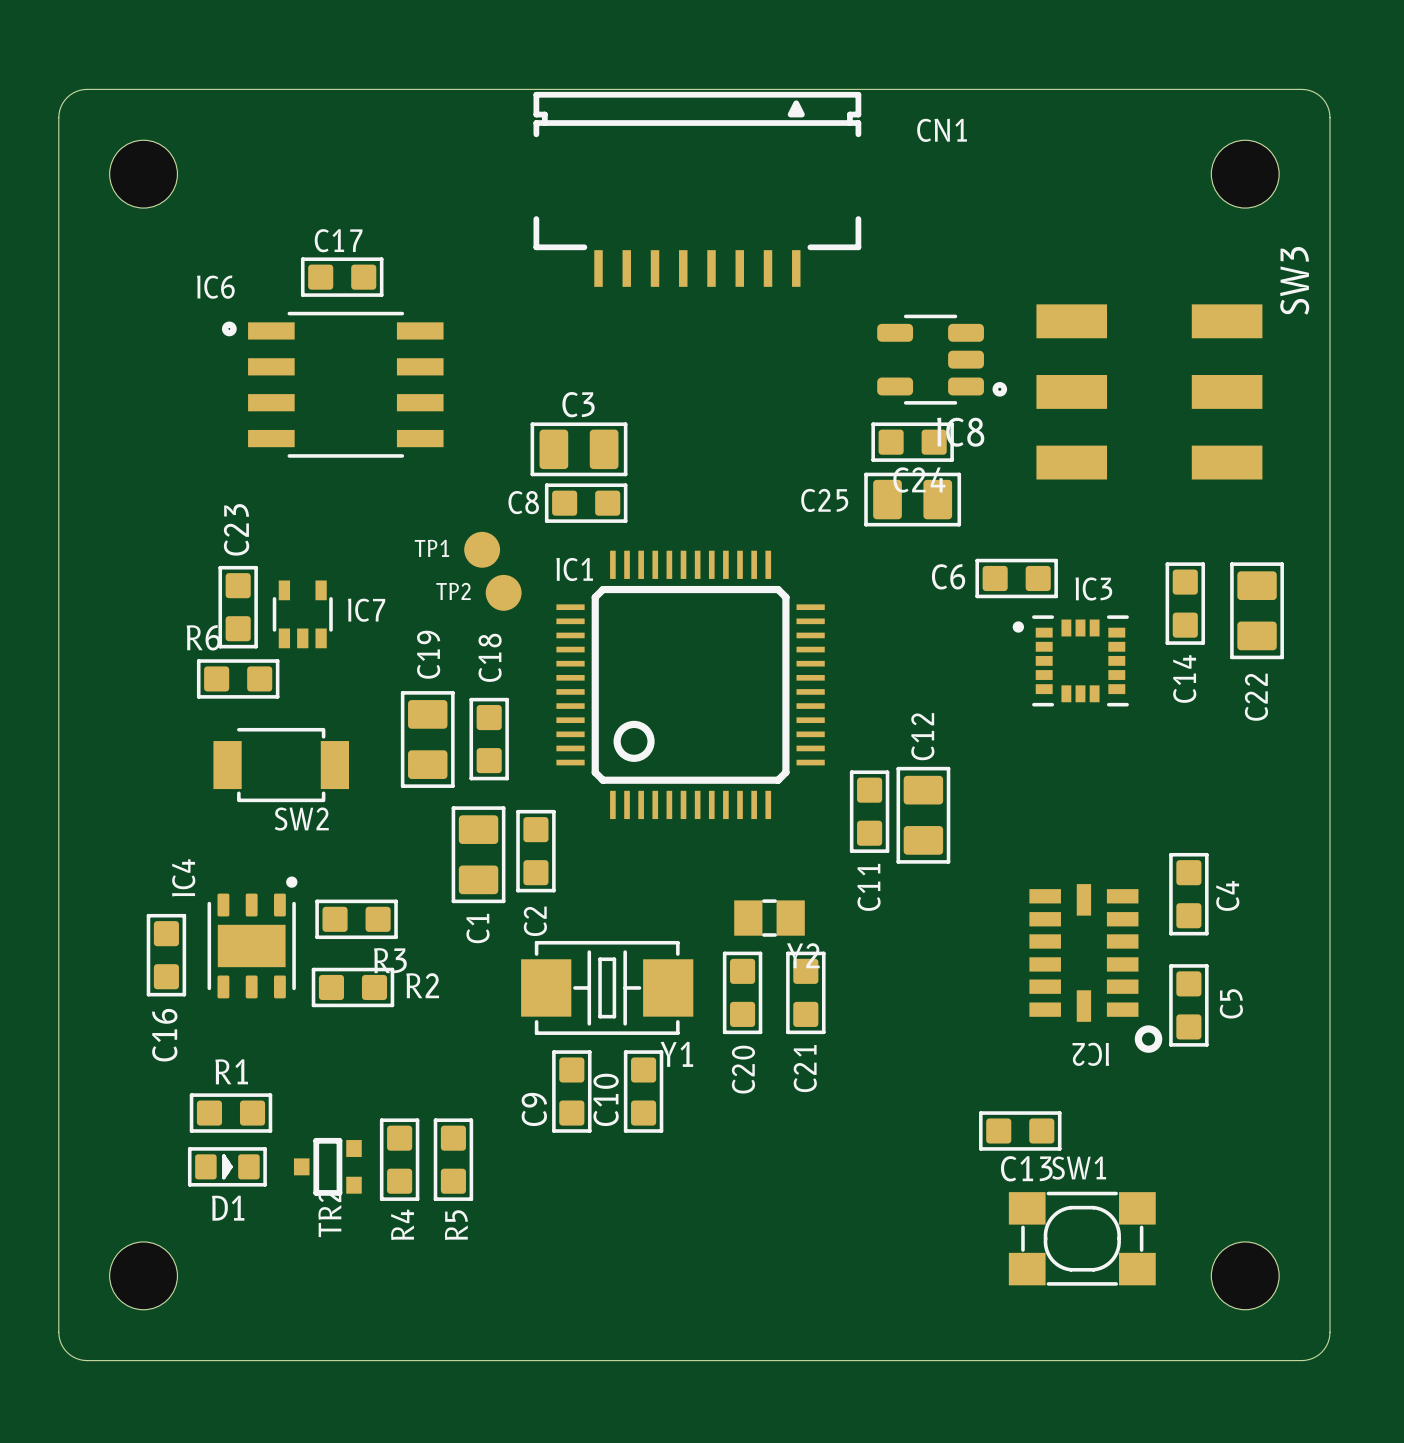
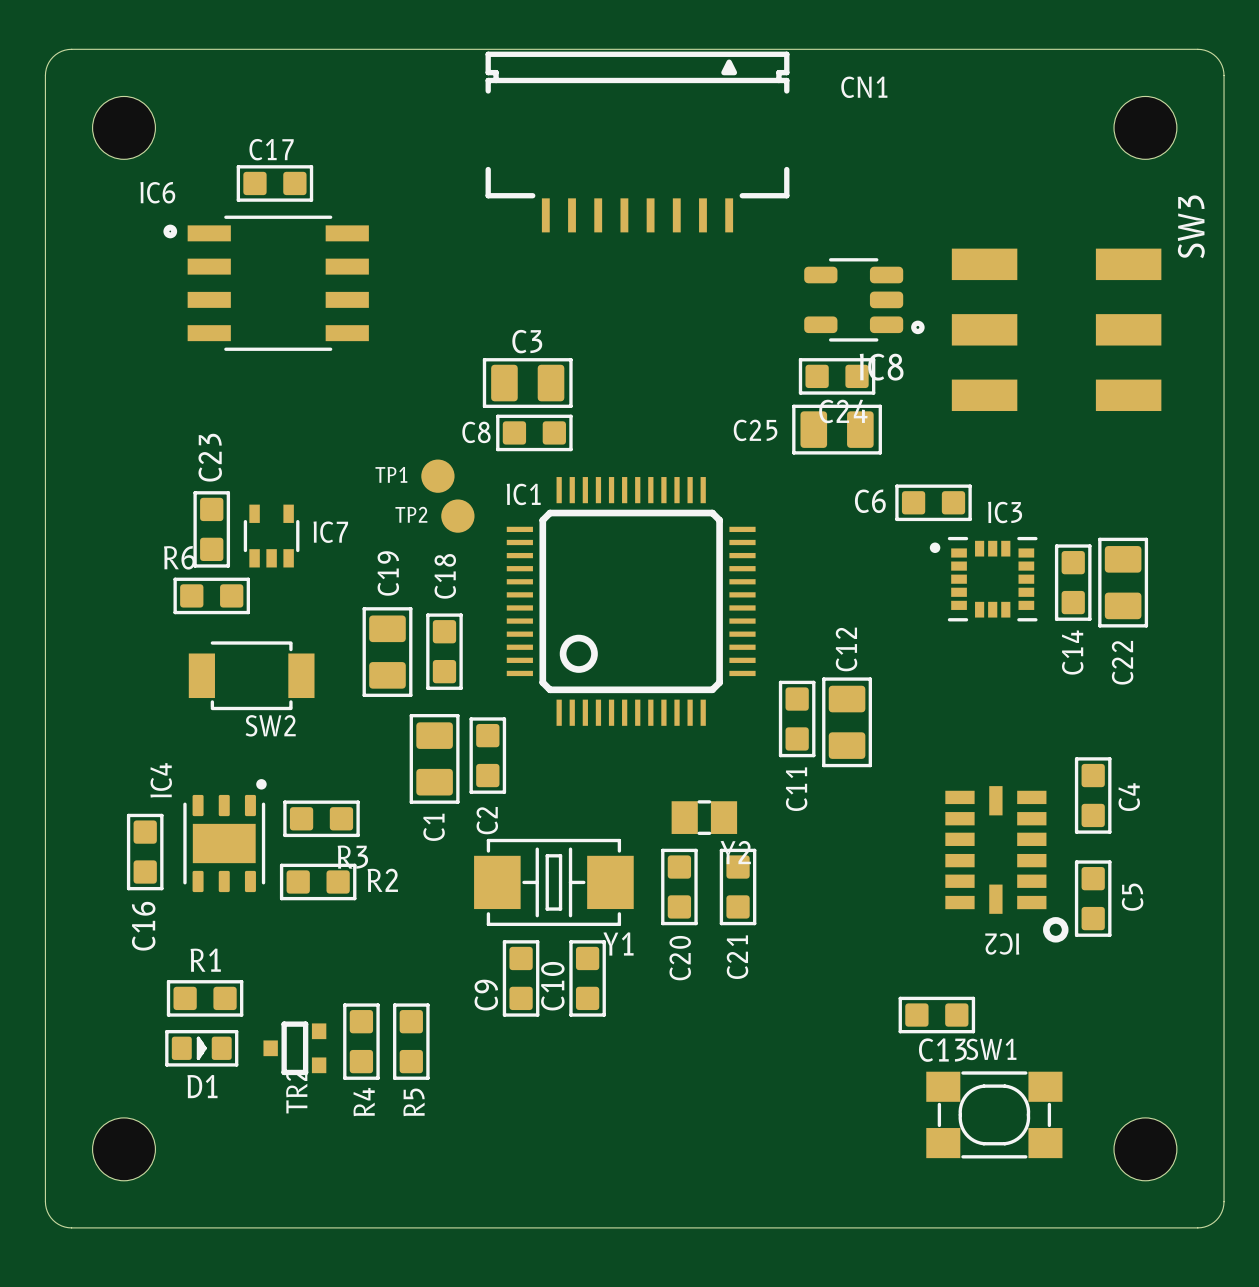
C17 position: (342, 277) -> (274, 183)
IC6 position: (332, 384) -> (266, 283)
C14 position: (1185, 603) -> (1073, 582)
C22 position: (1257, 610) -> (1123, 582)

